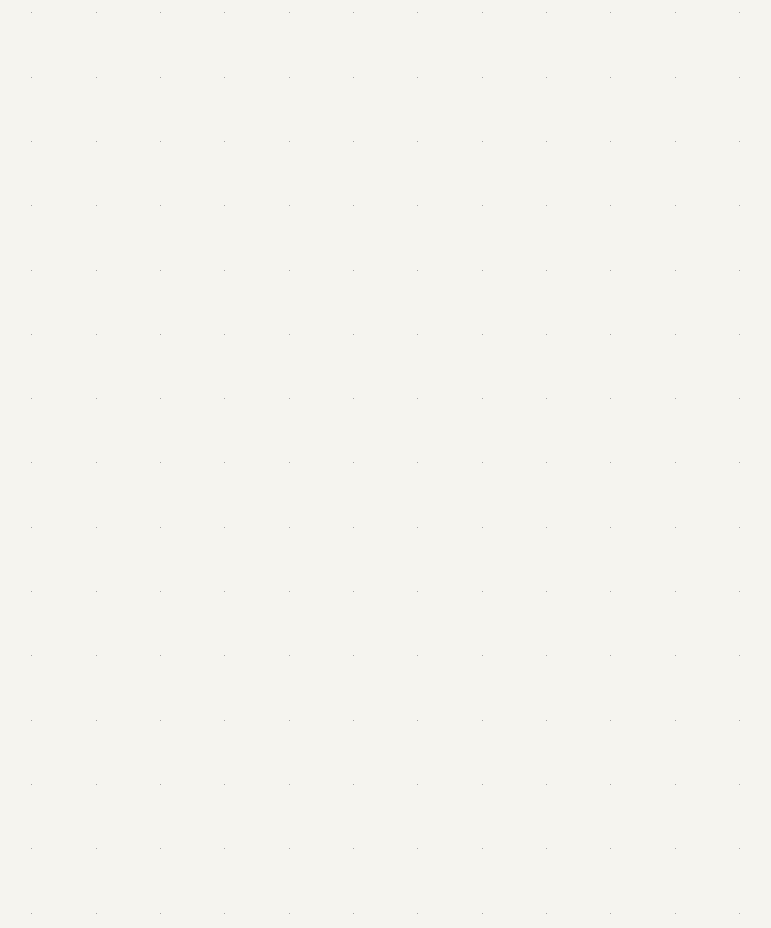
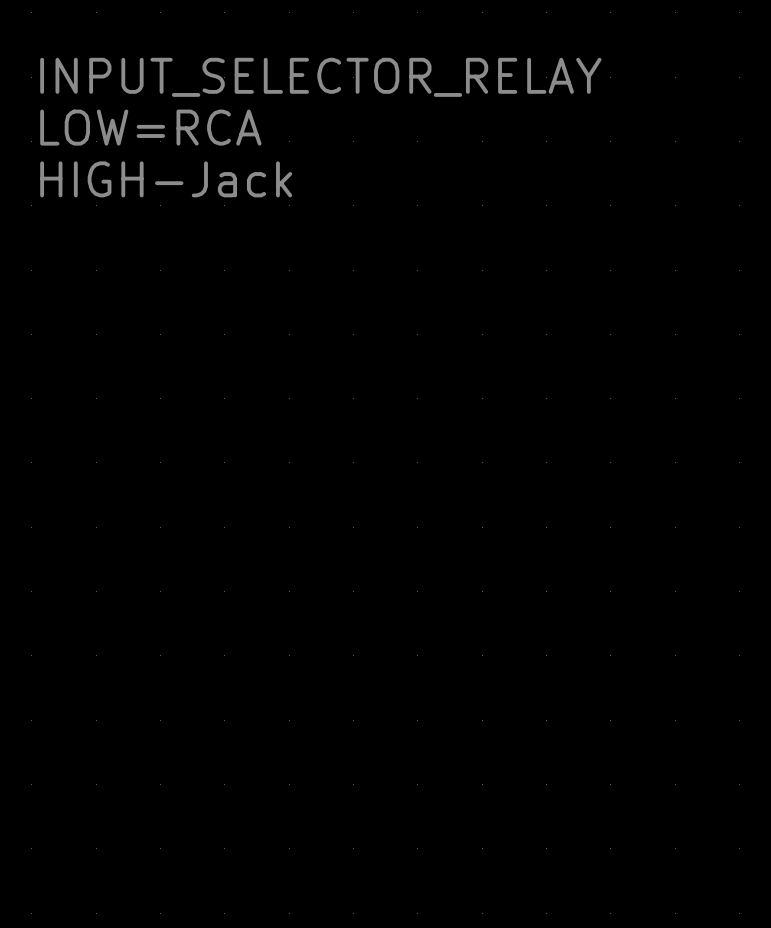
text: none -> INPUT_SELECTOR_RELAY (320, 77)
text: none -> LOW=RCA (150, 127)
text: none -> HIGH-Jack (166, 179)

